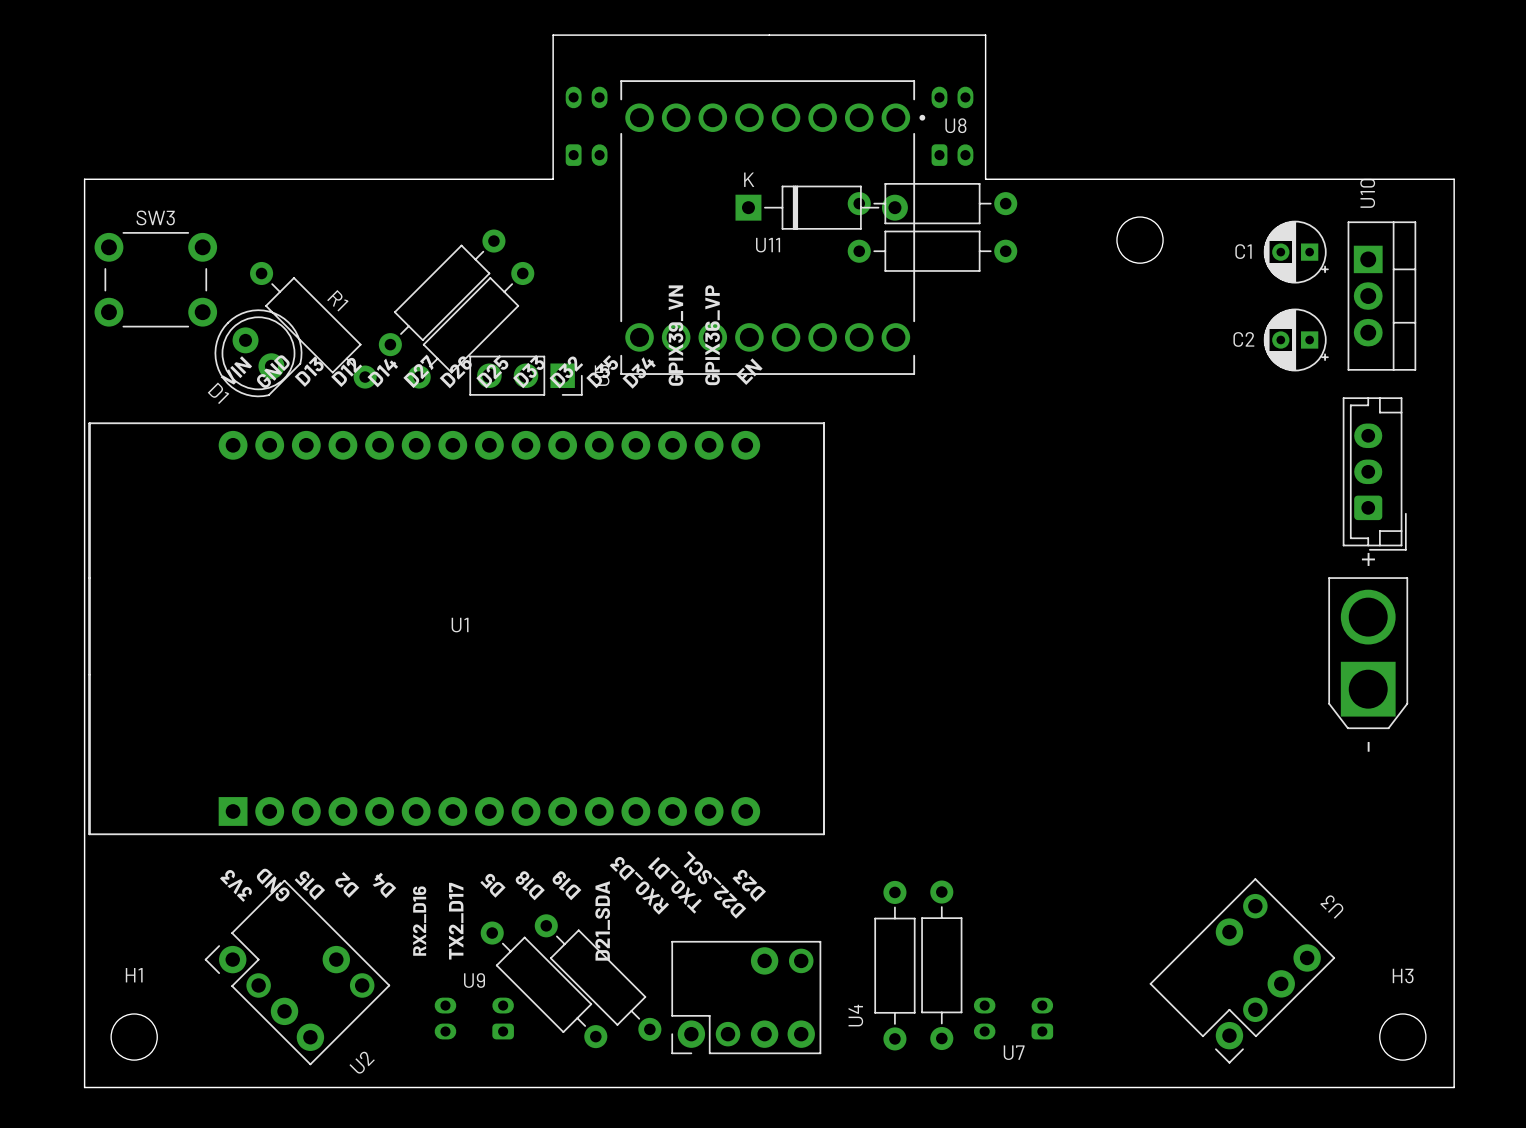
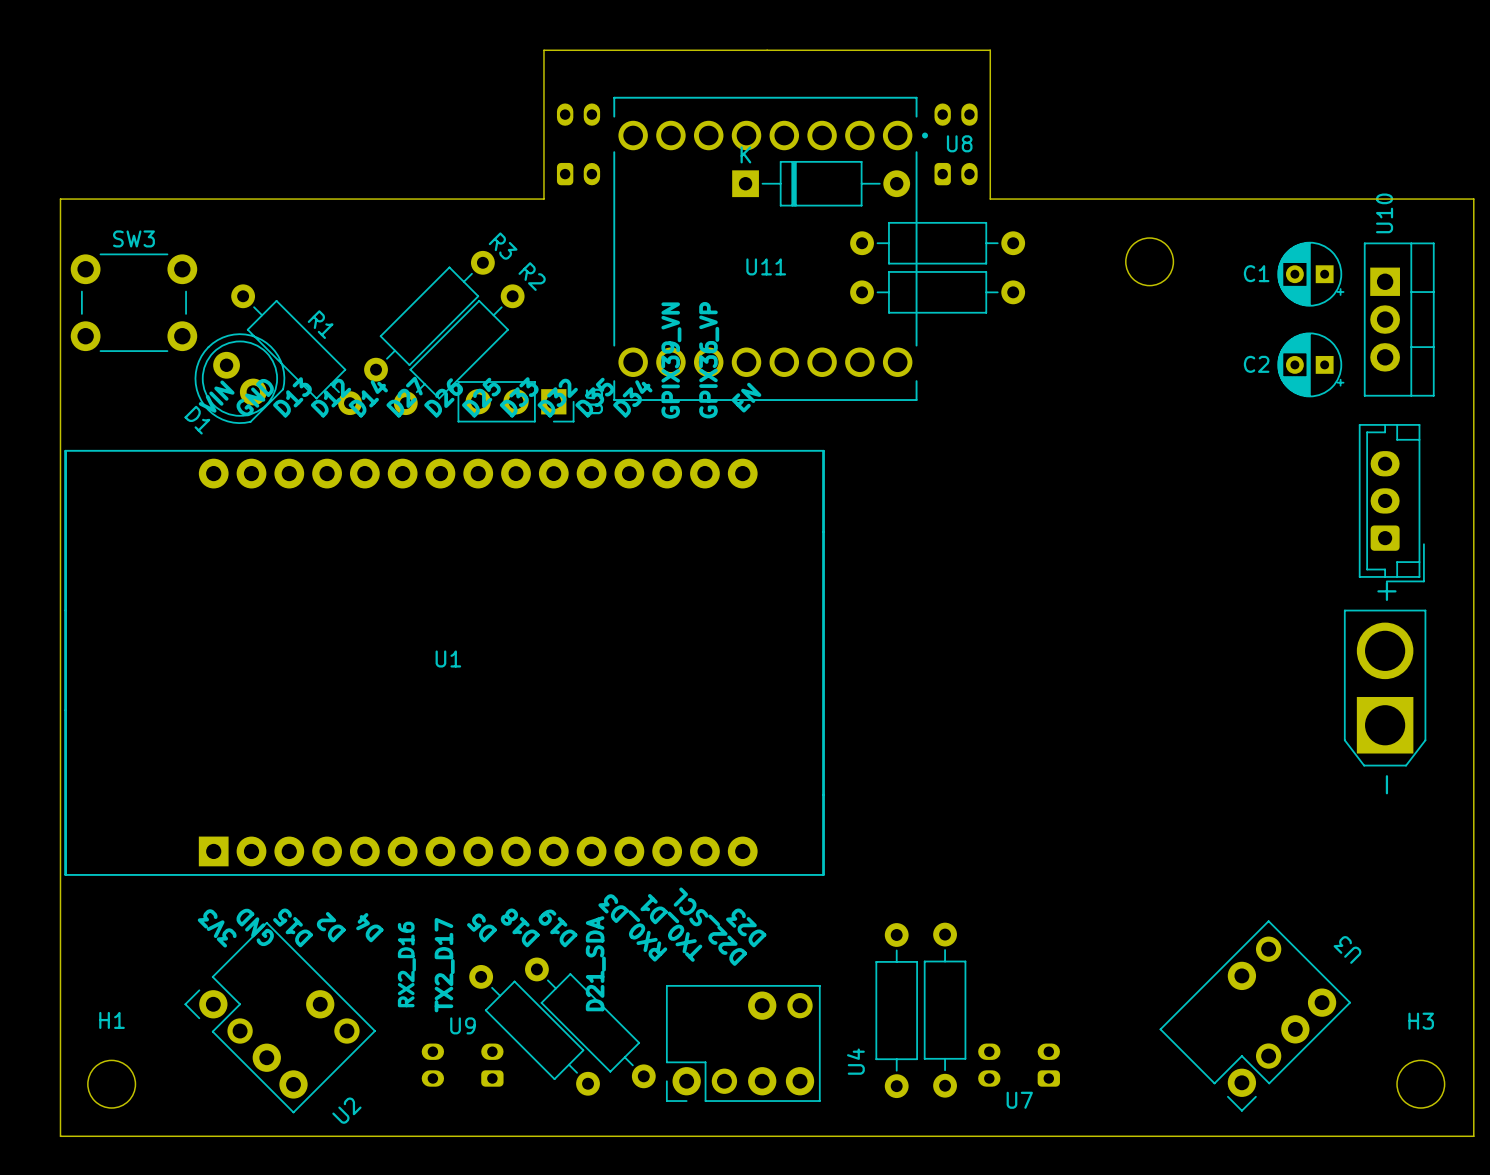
part: (932, 203) -> none
part position: (821, 207) -> (821, 183)
part: none -> (937, 243)
R3 name: none -> R3 (503, 246)
part: (932, 251) -> none
R2 name: none -> R2 (532, 276)
part: none -> (937, 292)

